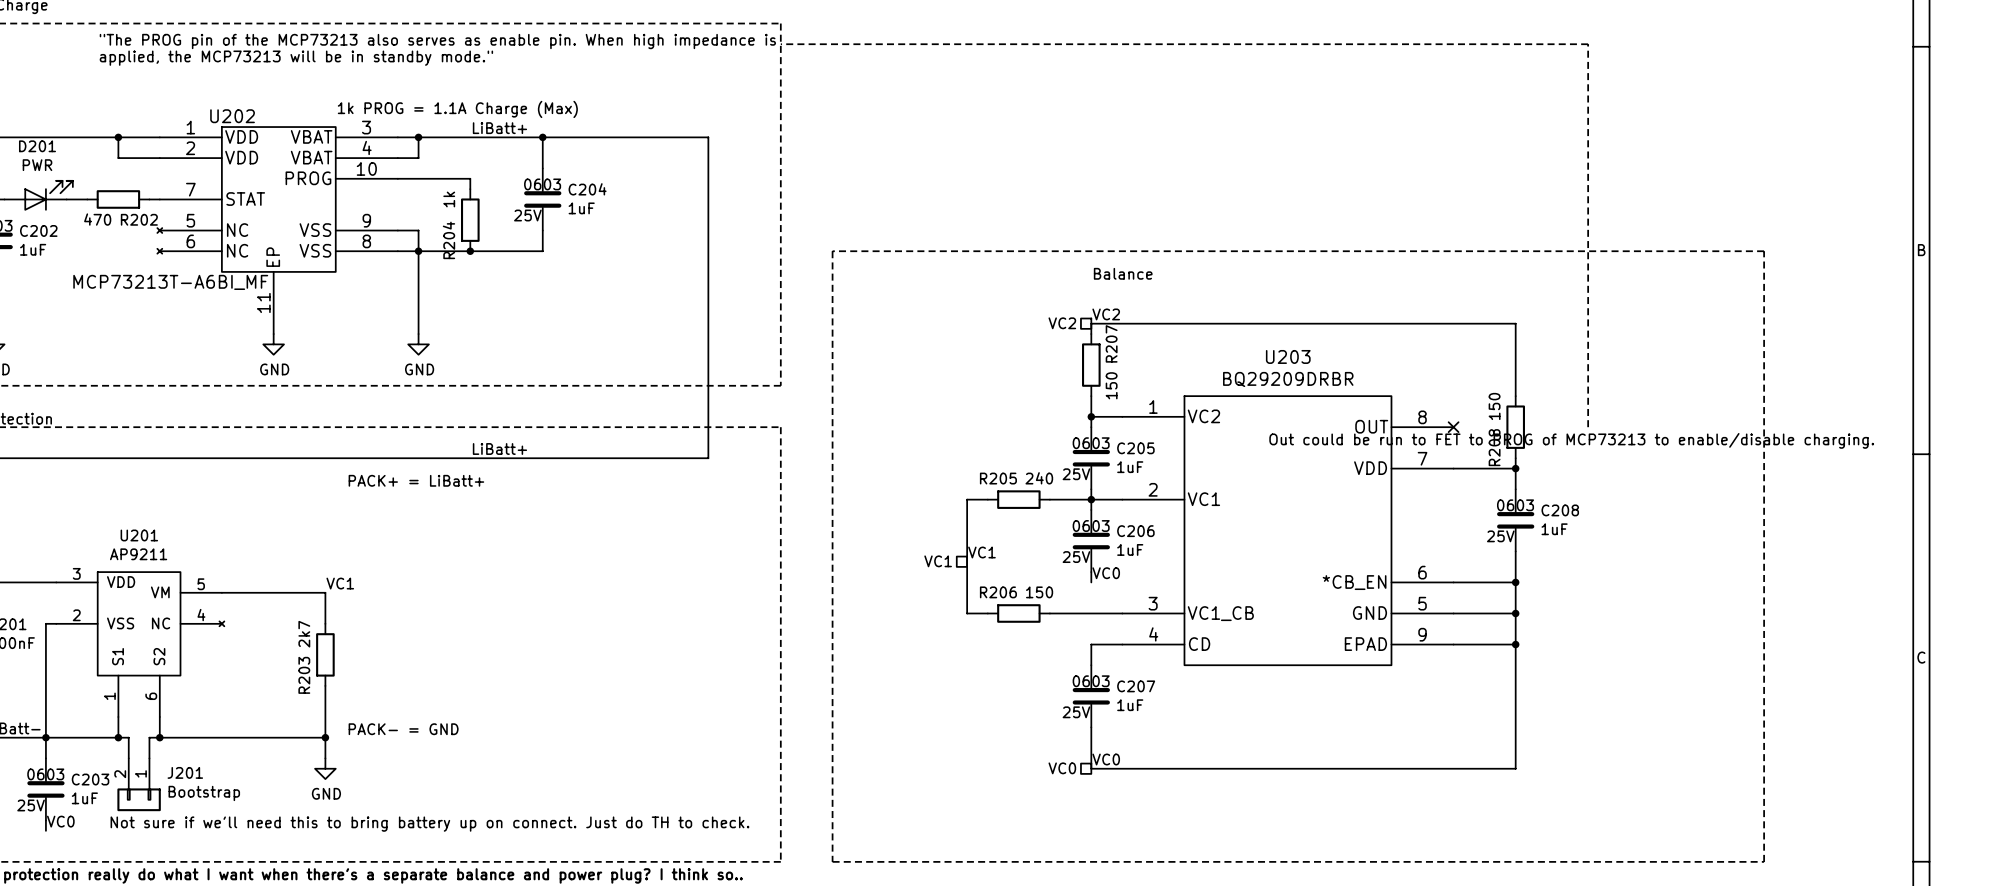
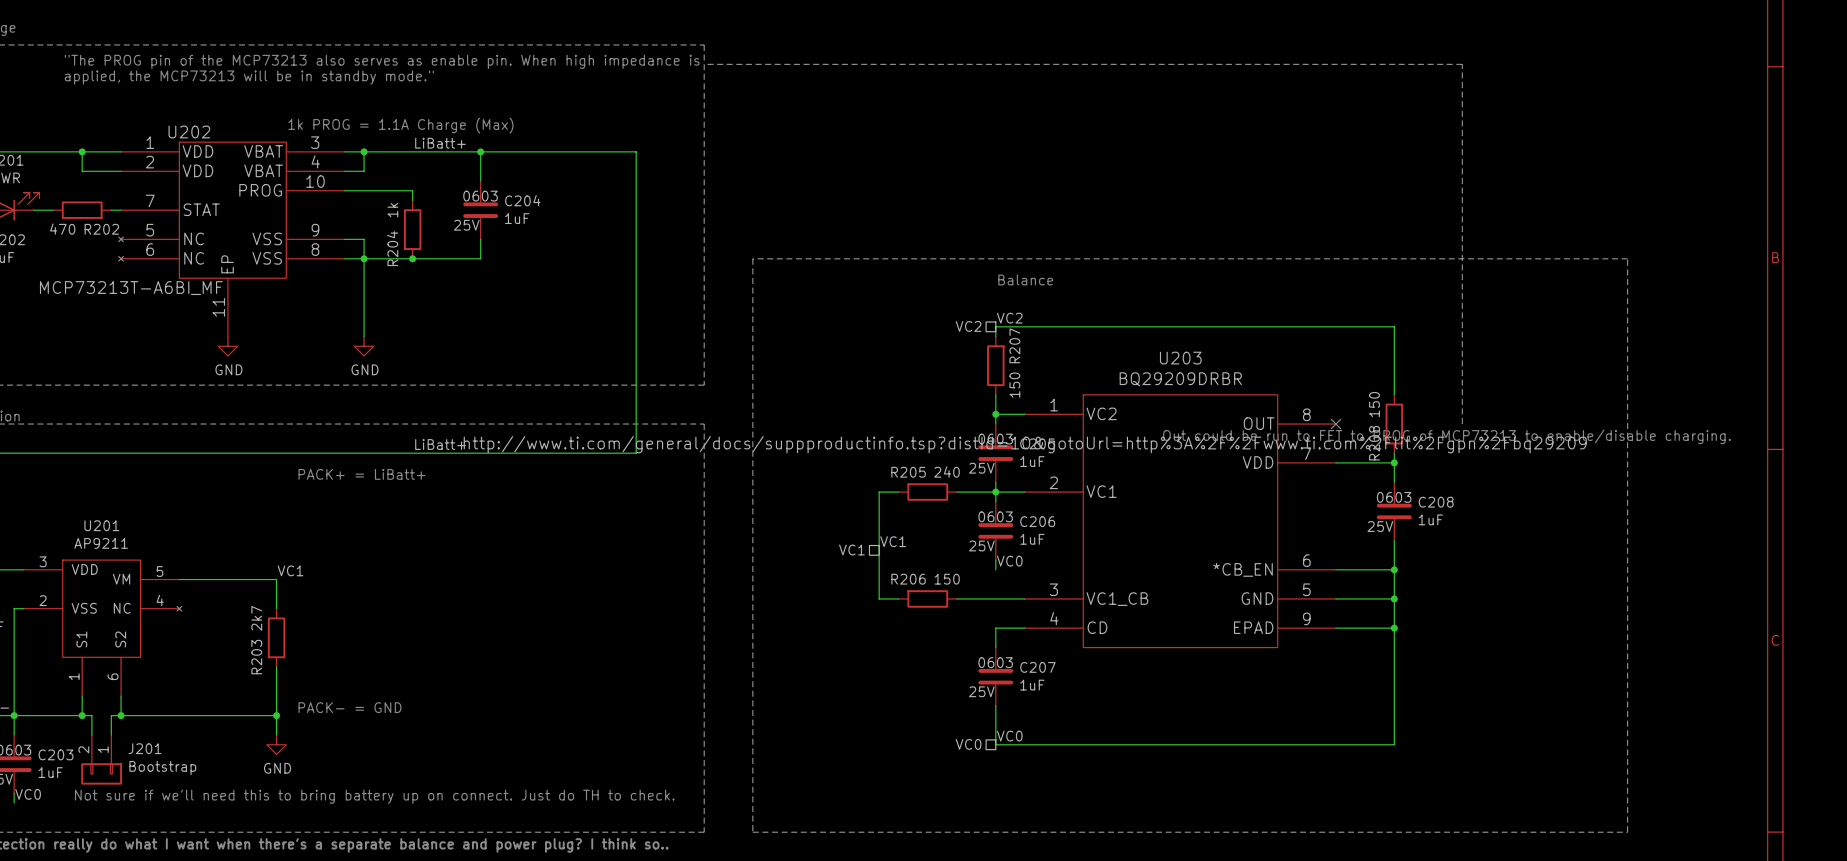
U203 text: none -> http://www.ti.com/general/docs/suppproductinfo.tsp?distId=10&gotoUrl=http%3A%2F%2Fwww.ti.com%2Flit%2Fgpn%2Fbq29209 (1025, 444)

